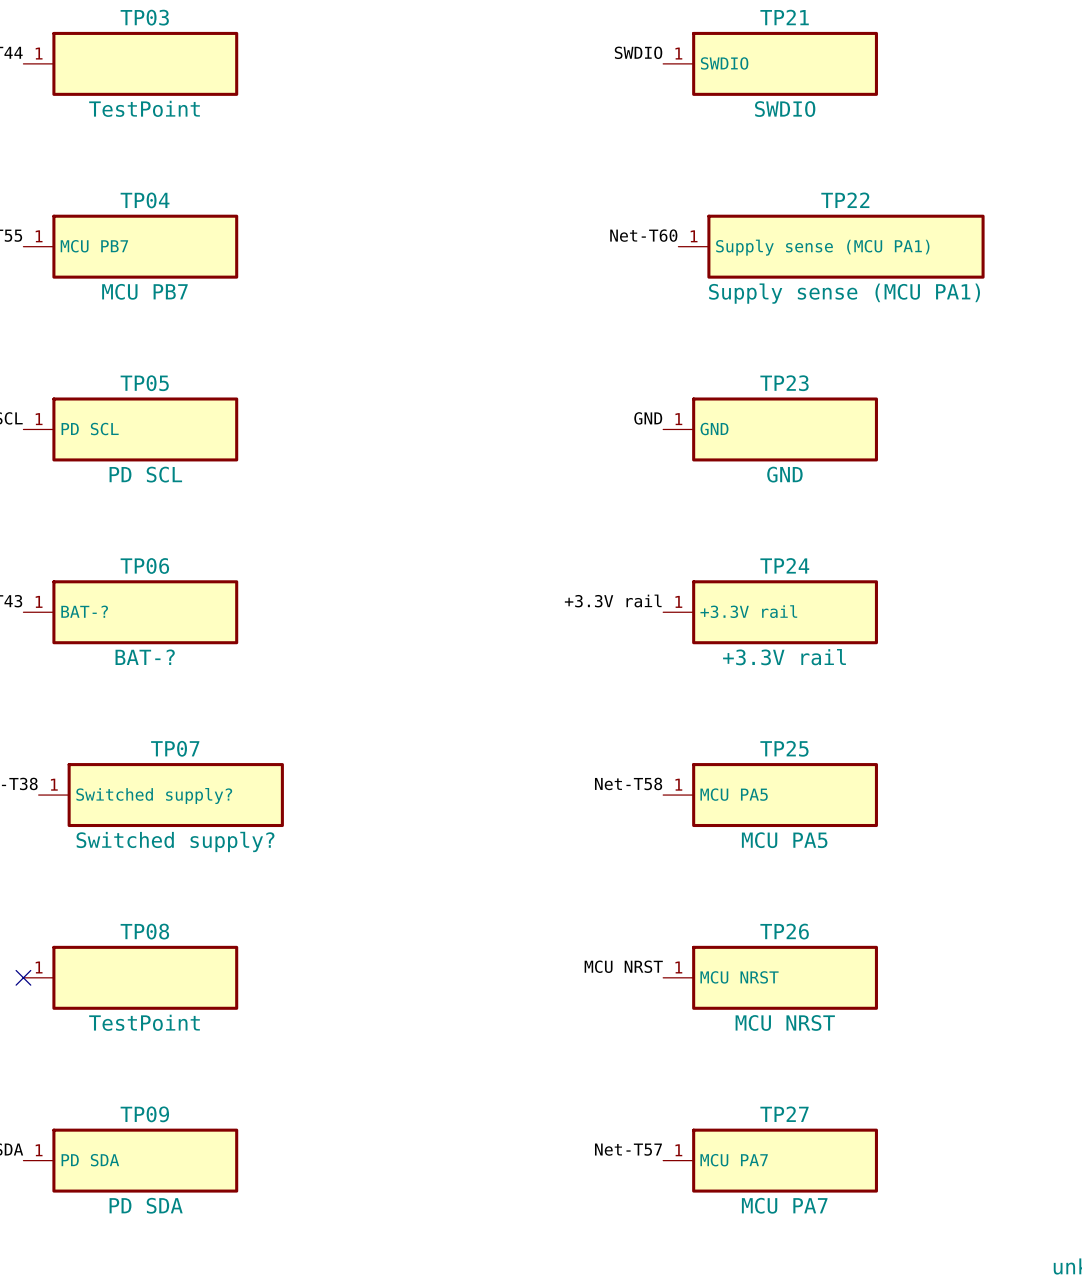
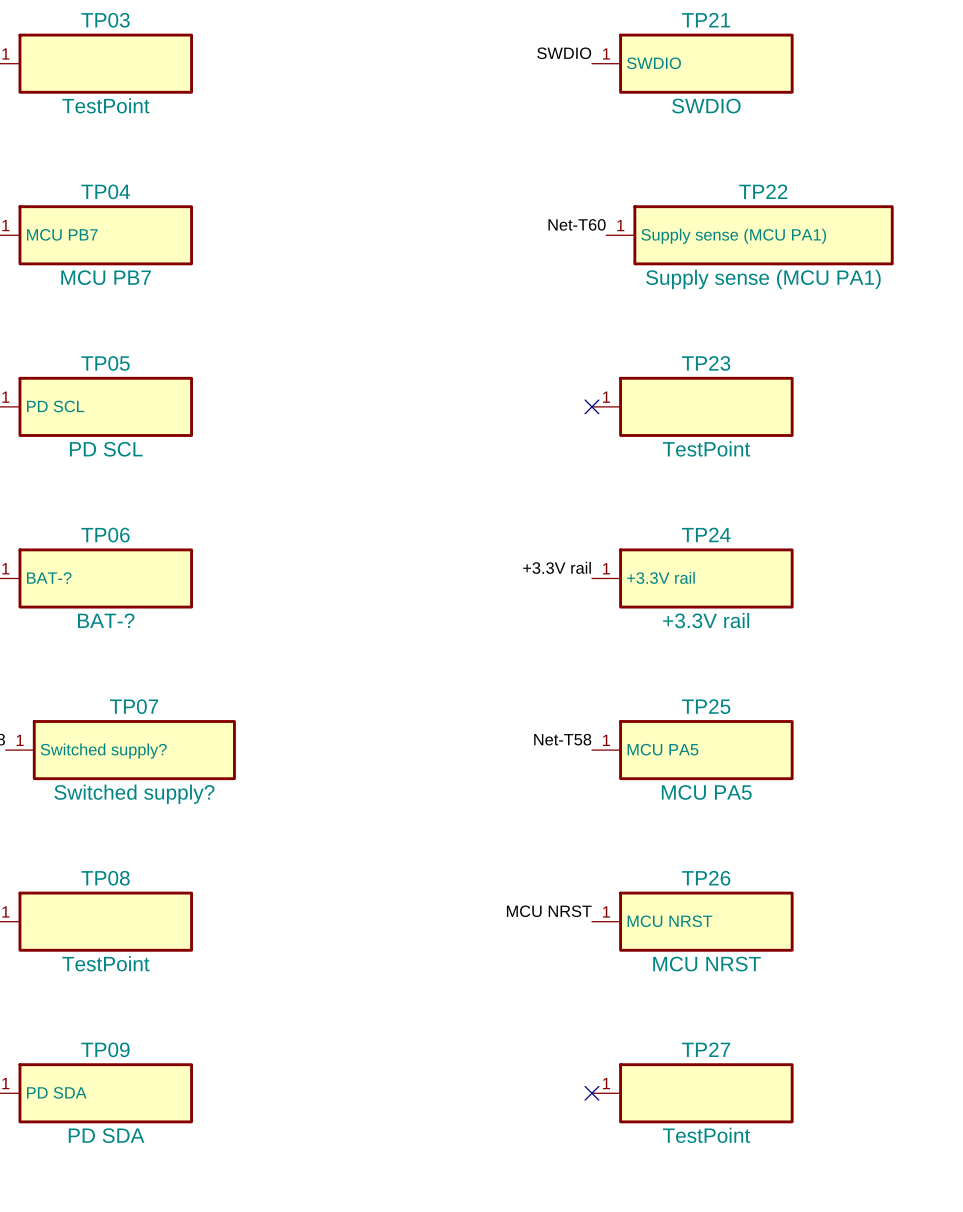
label: GND (648, 418) -> none
no-connect mark: none -> (591, 406)
TP23 pin name: GND (714, 429) -> none
TP23 value: GND (784, 474) -> TestPoint (706, 448)
label: Net-T57 (628, 1149) -> none
no-connect mark: none -> (591, 1093)
TP27 pin name: MCU PA7 (734, 1160) -> none
TP27 value: MCU PA7 (784, 1205) -> TestPoint (706, 1135)

